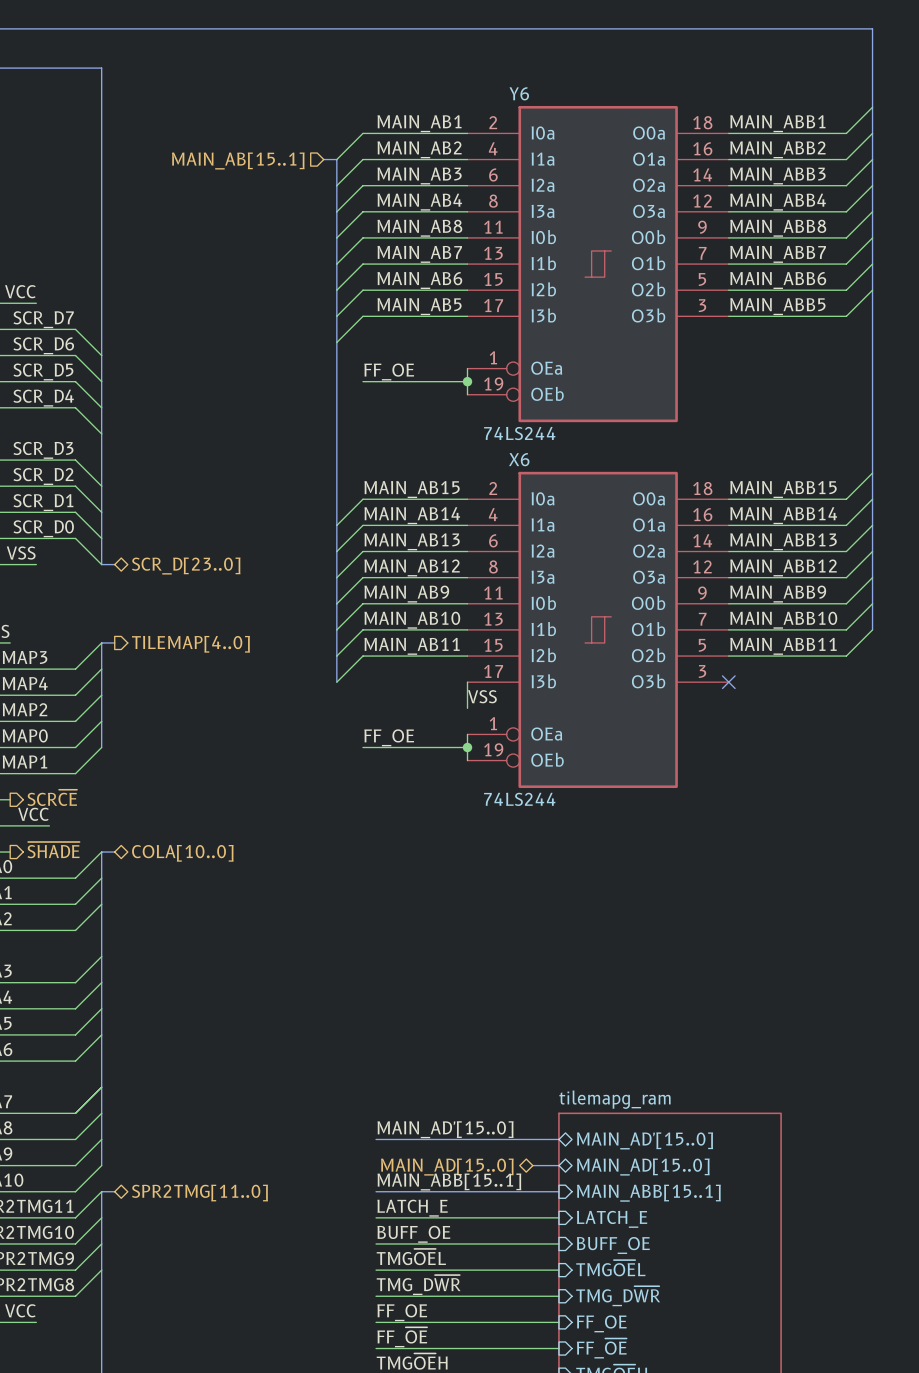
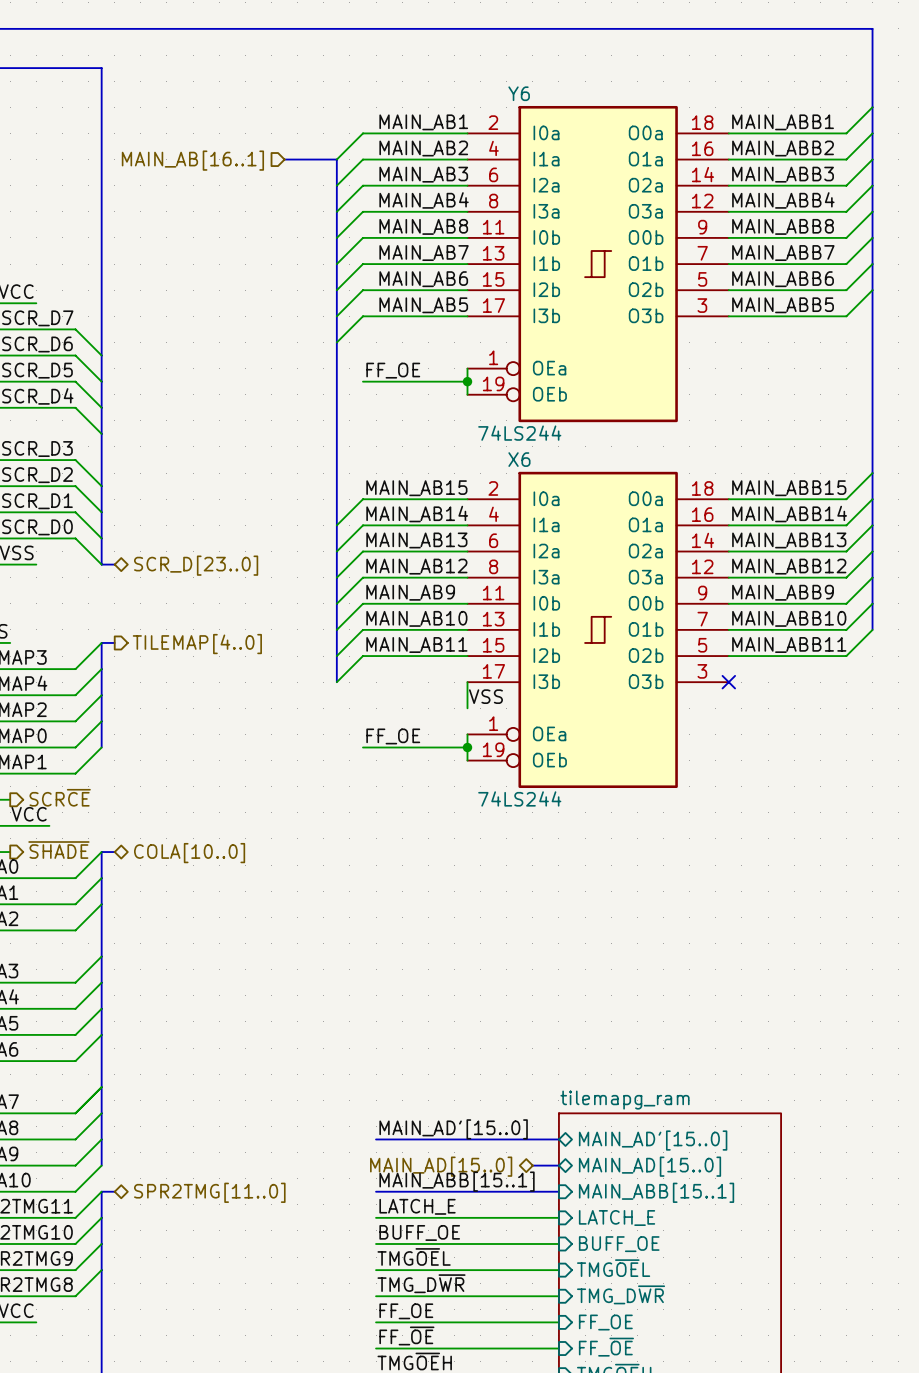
bus: none -> (284, 159) (323, 159)
hierarchical label: MAIN_AB[15..1] (238, 161) -> MAIN_AB[16..1] (192, 160)

